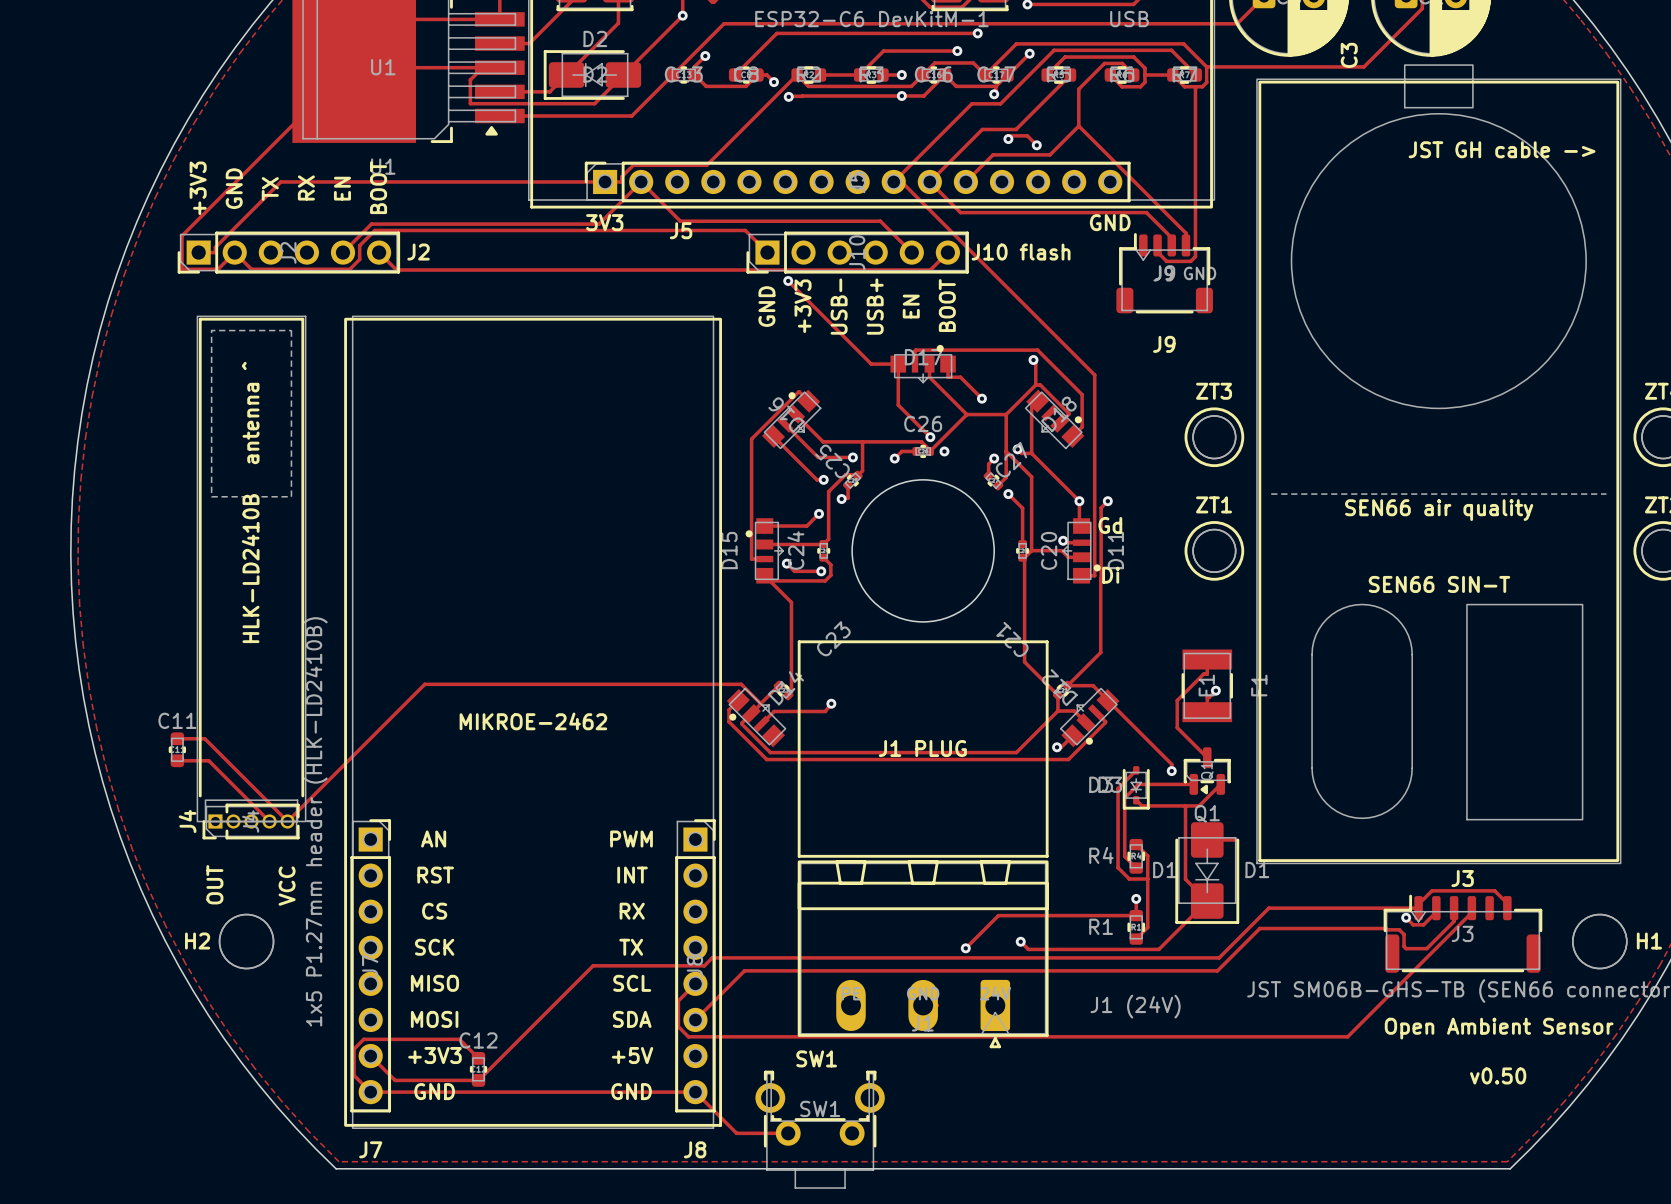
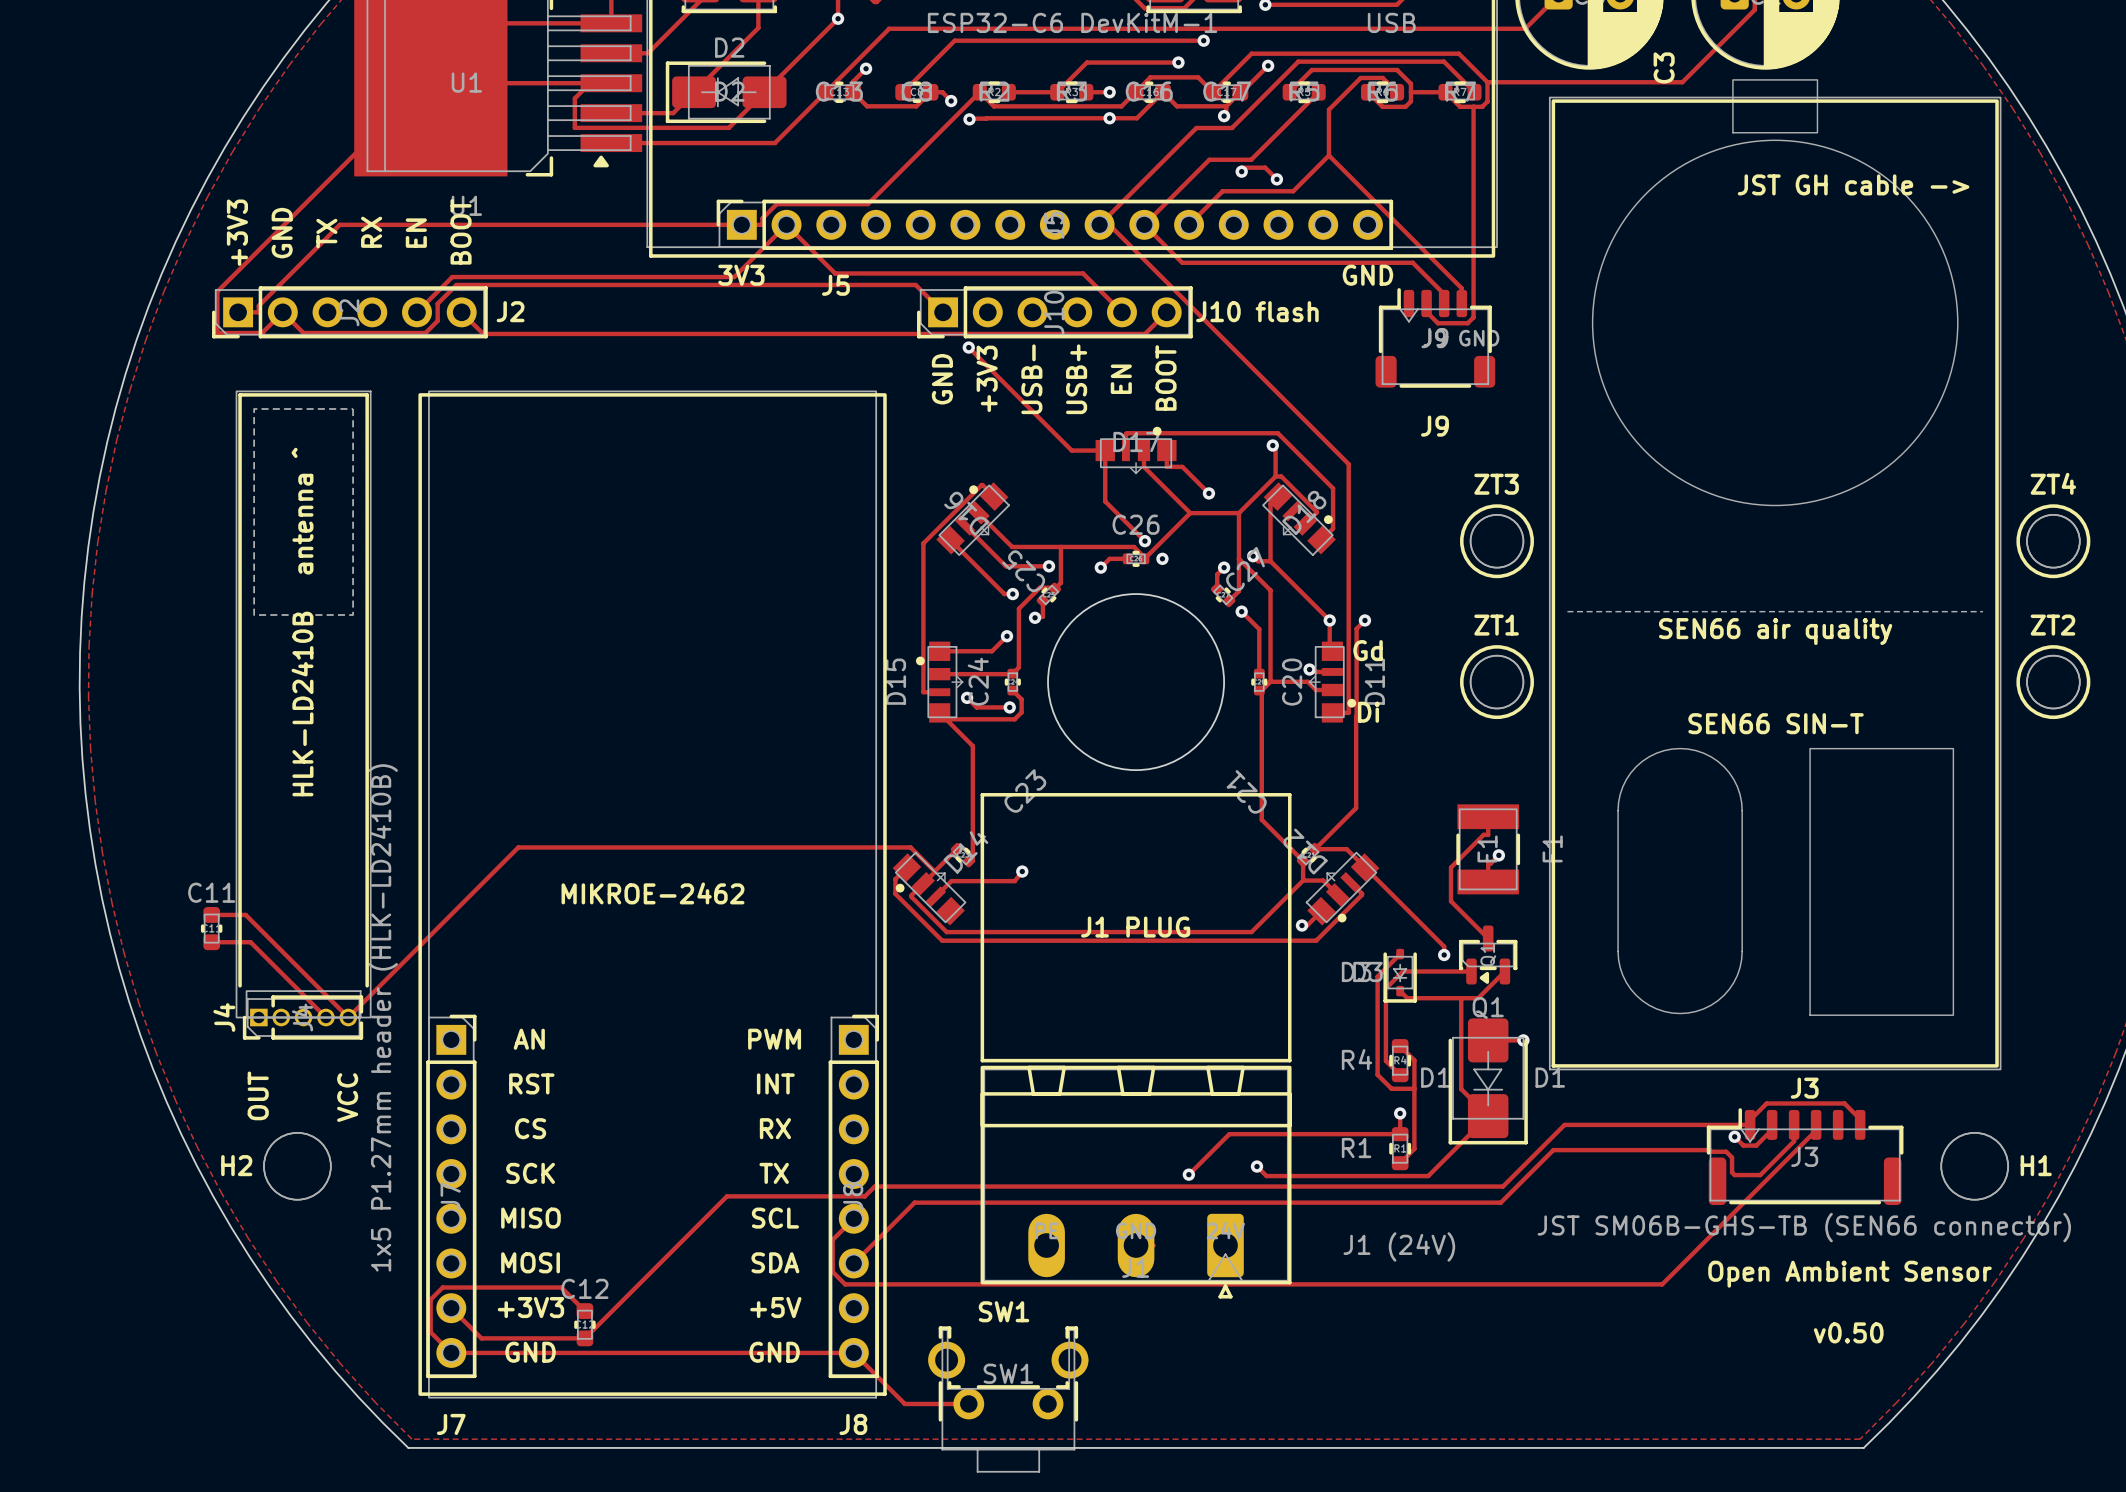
via: none -> (1523, 1040)

